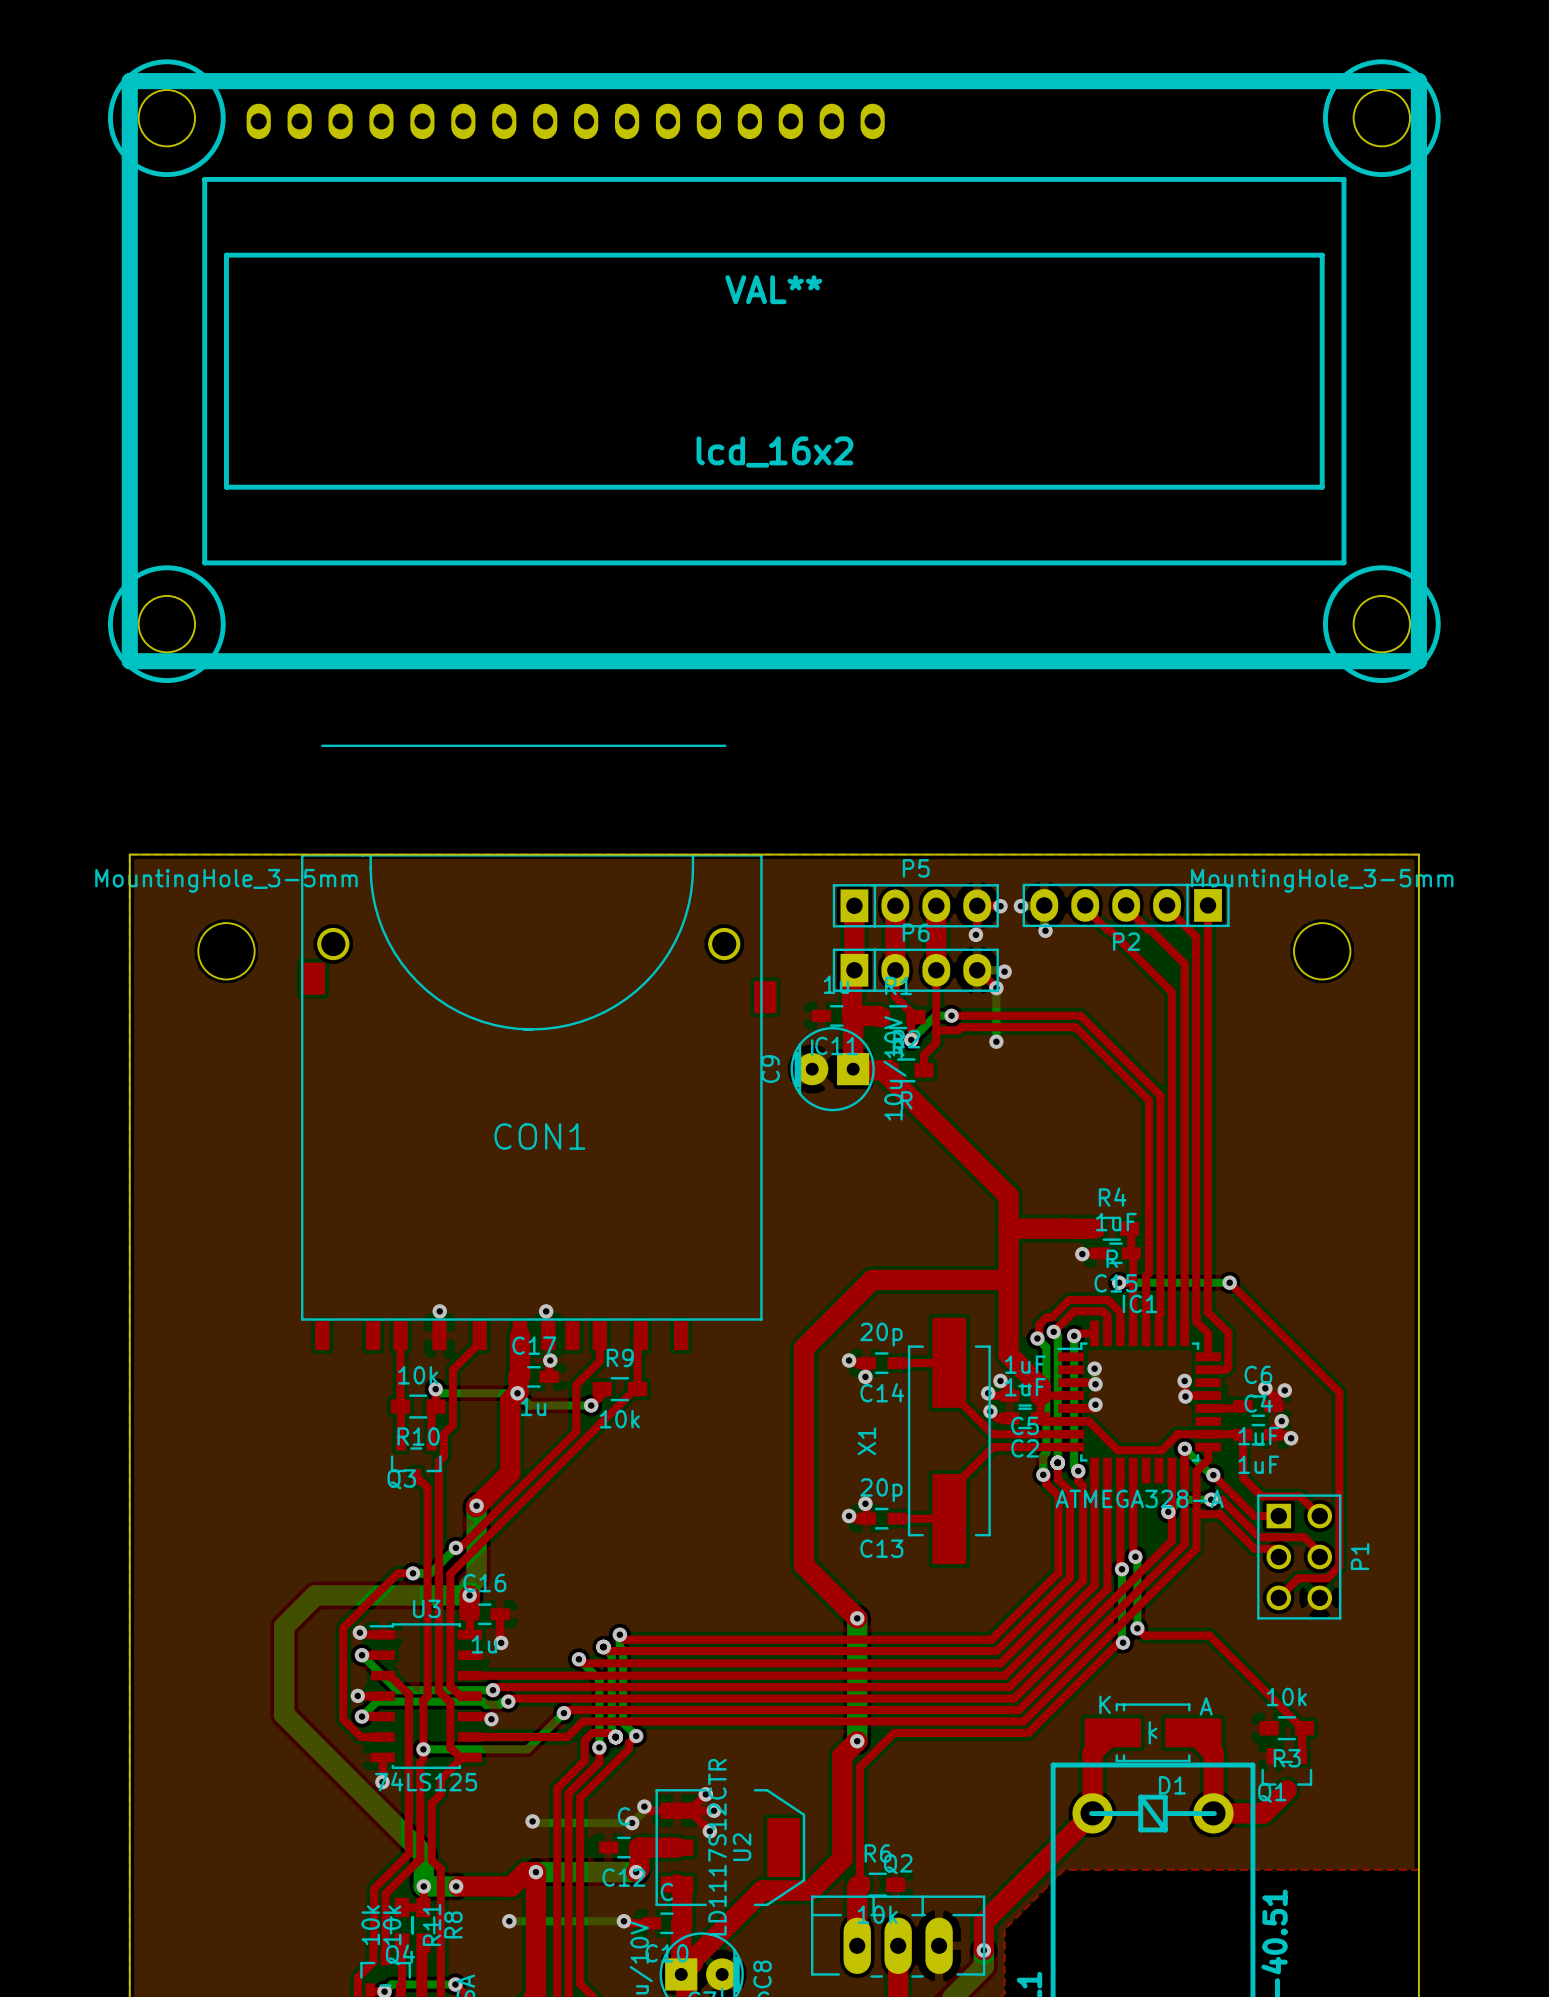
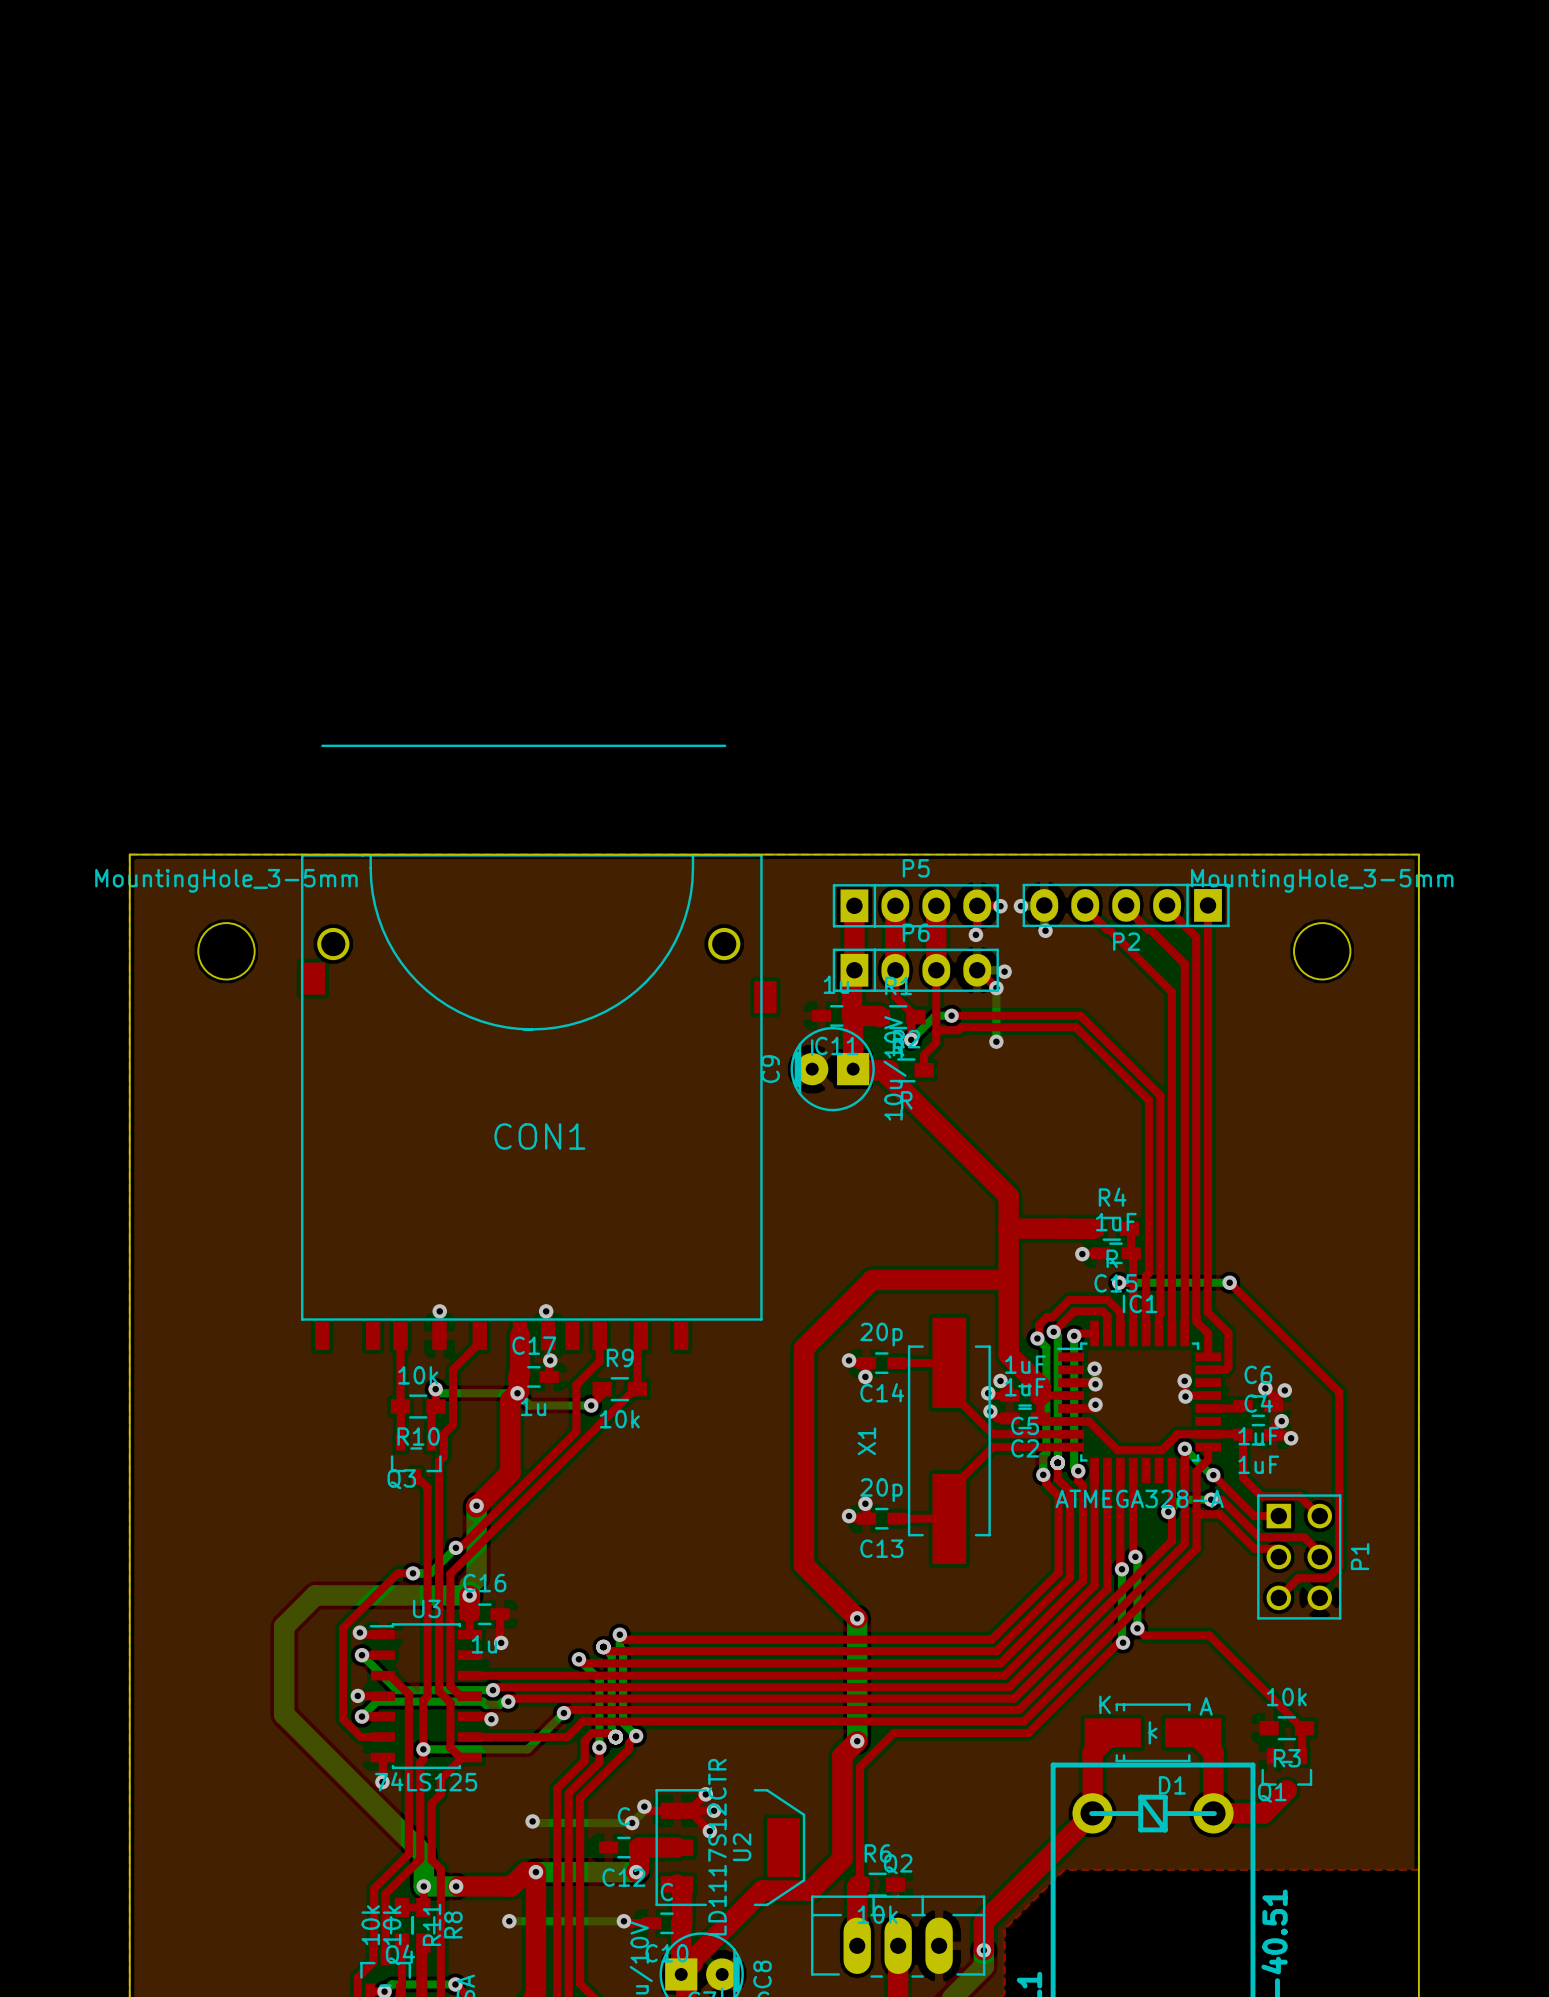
lcd_16x2: VAL** (774, 371) -> none

